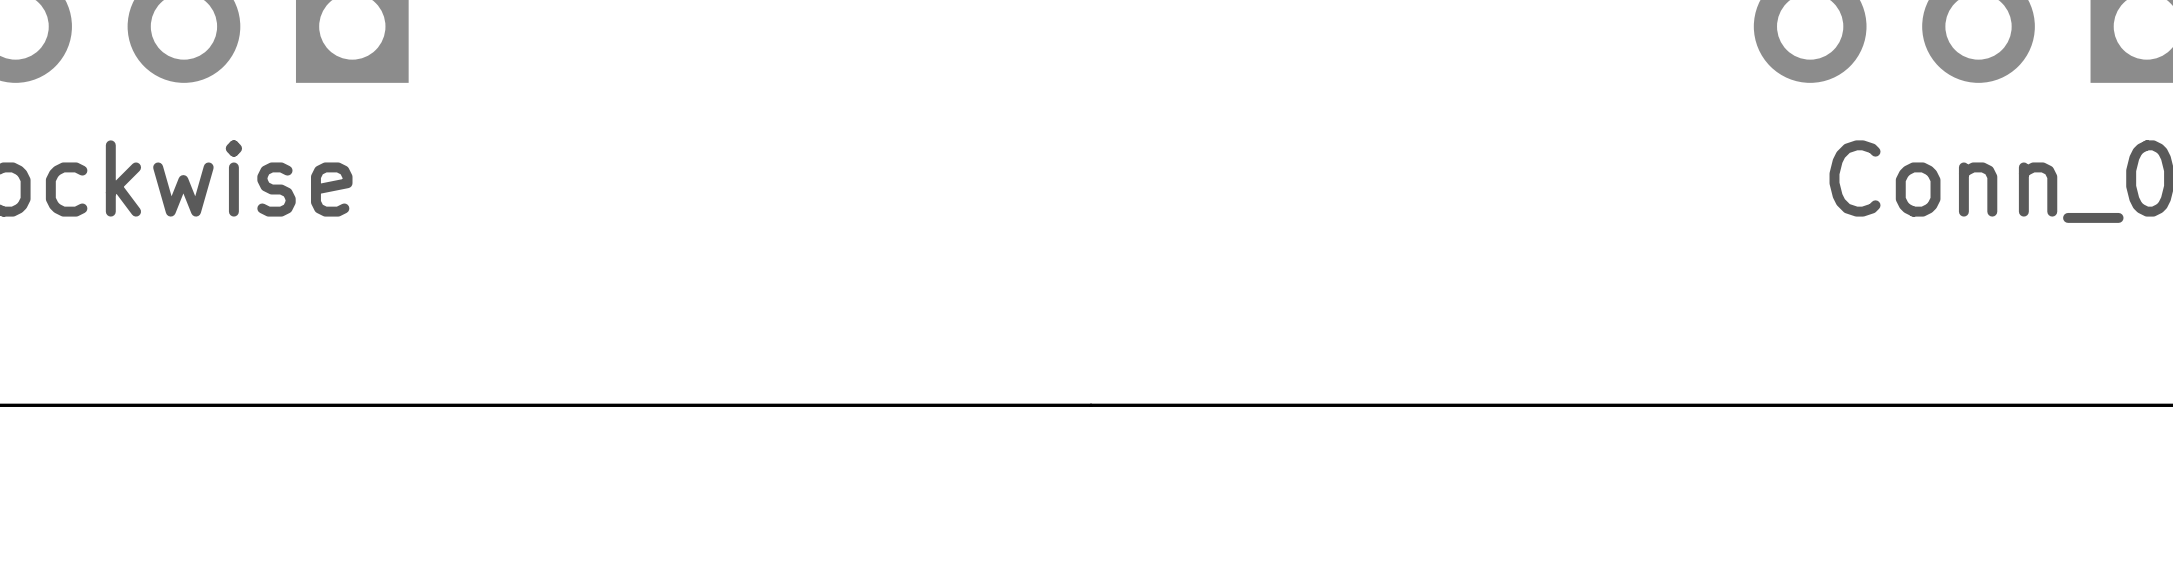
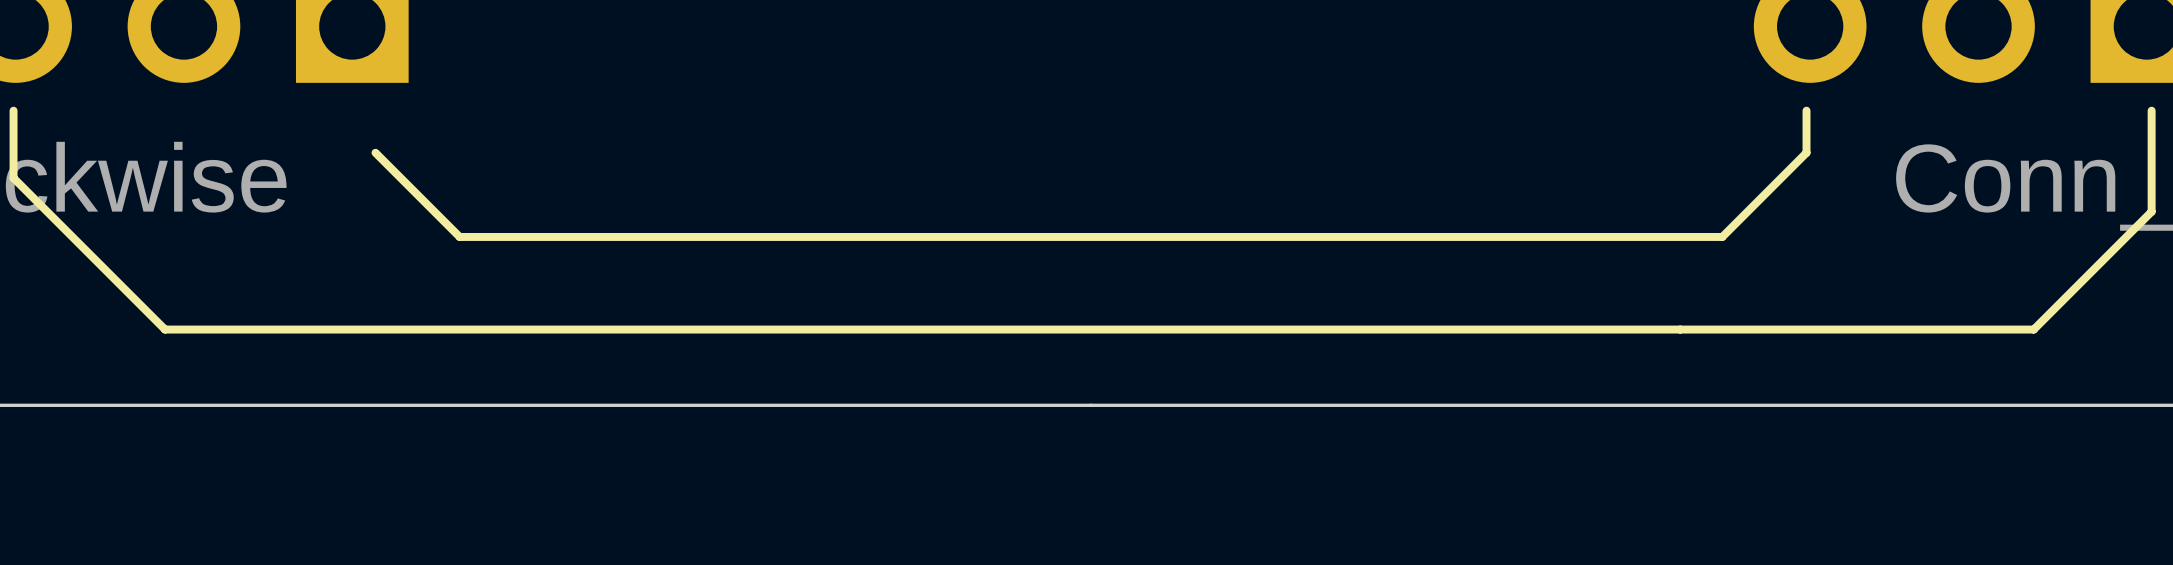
line: none -> (1806, 110) (1806, 152) (1722, 236) (459, 236) (375, 152)
line: none -> (2151, 110) (2151, 211) (2033, 329) (165, 329) (13, 178) (13, 110)

